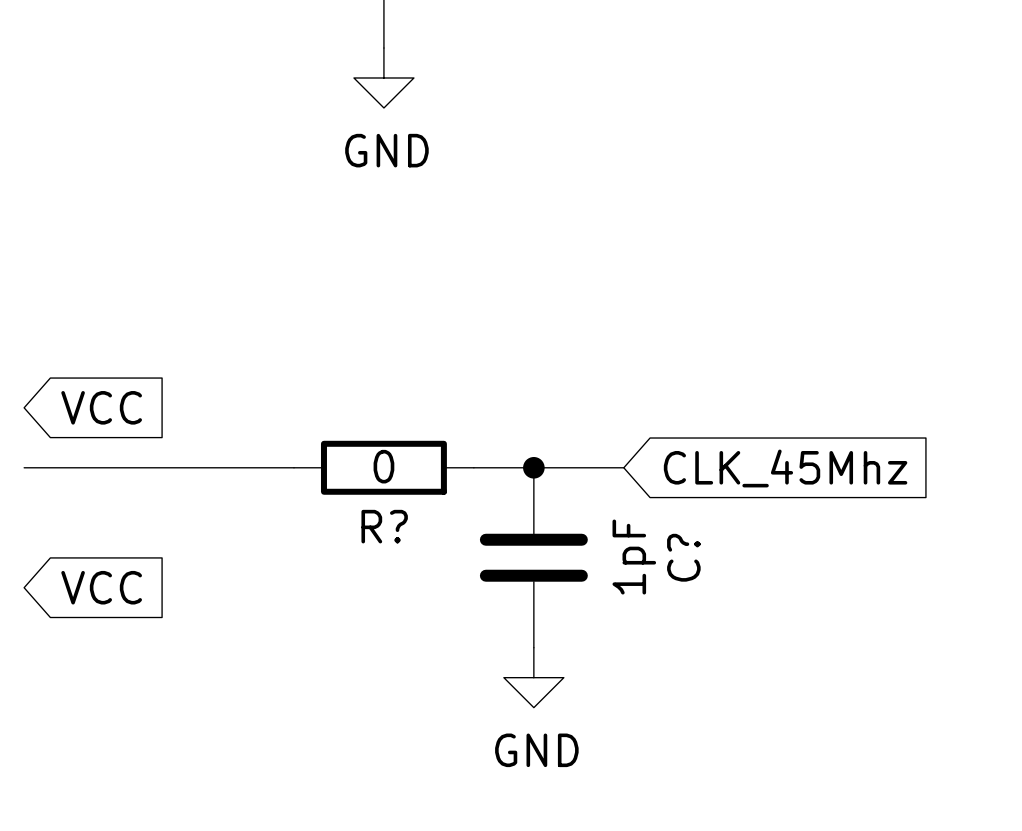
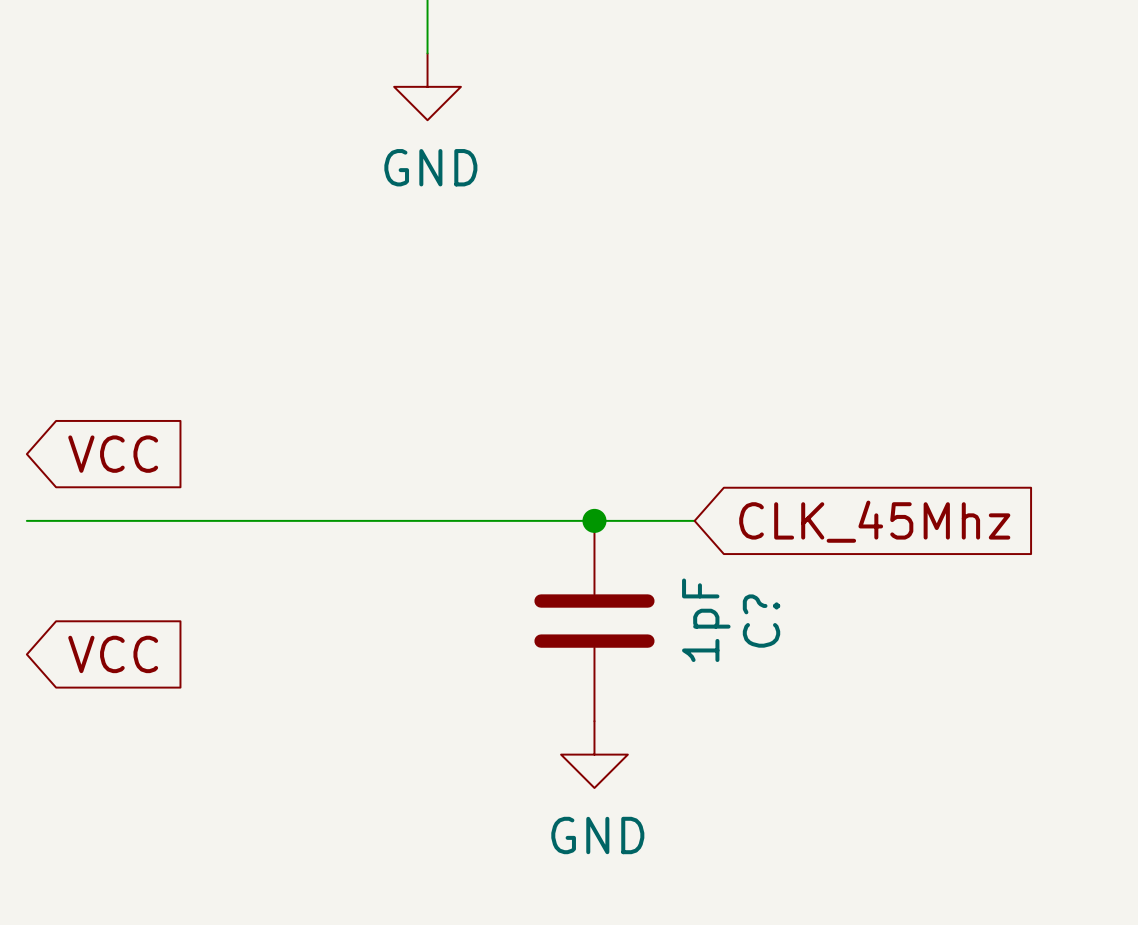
wire: none -> (327, 520) (527, 520)
R?: 0 (383, 467) -> none

